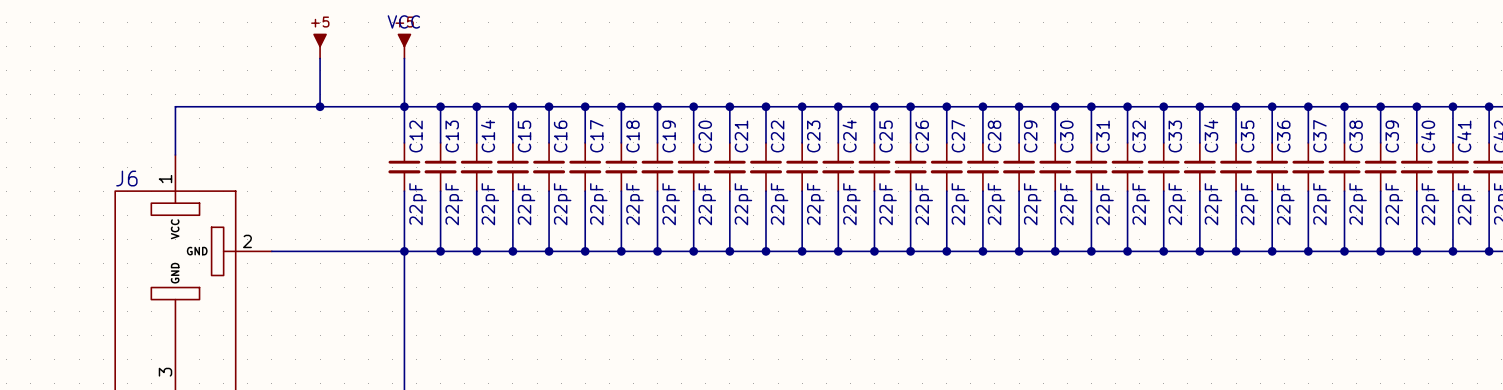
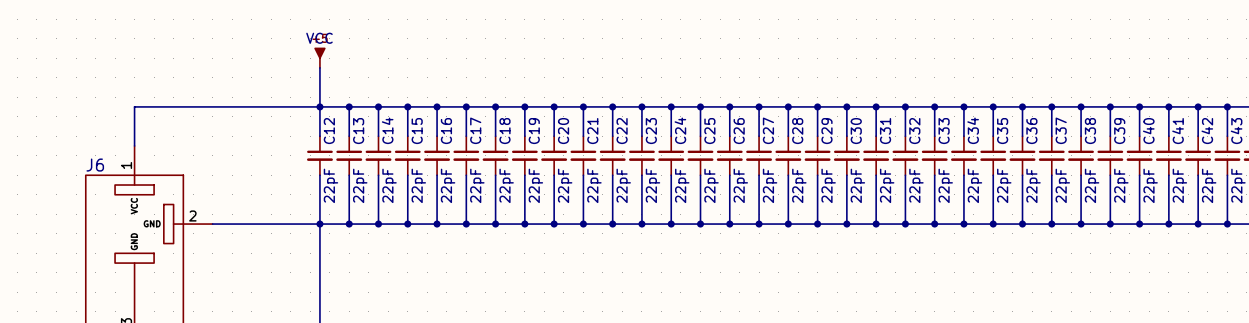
power symbol: (320, 46) -> none
wire: (320, 58) (320, 106) -> none
junction: (320, 106) -> none

